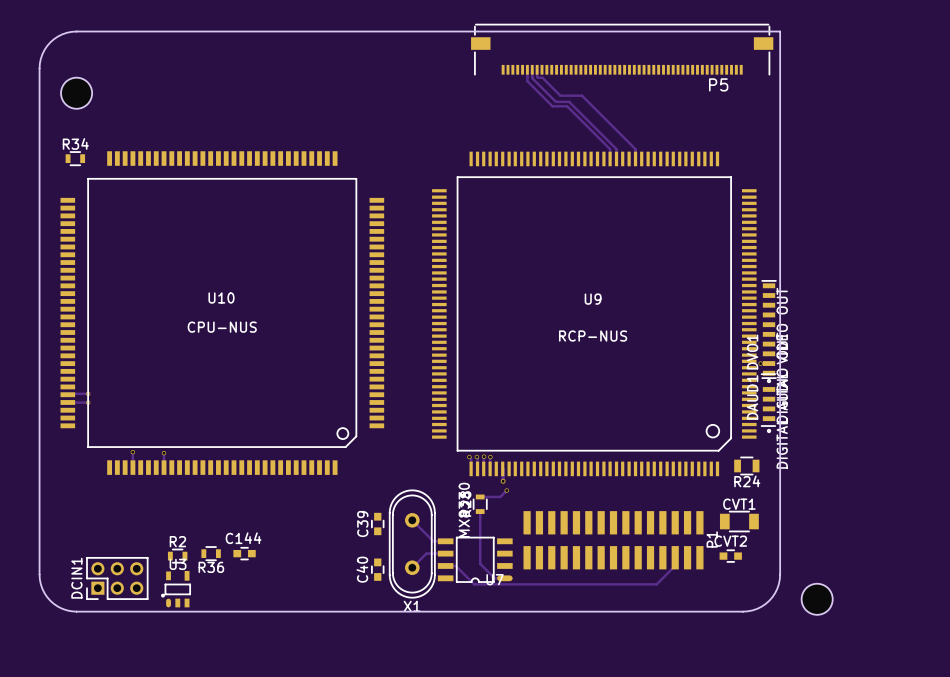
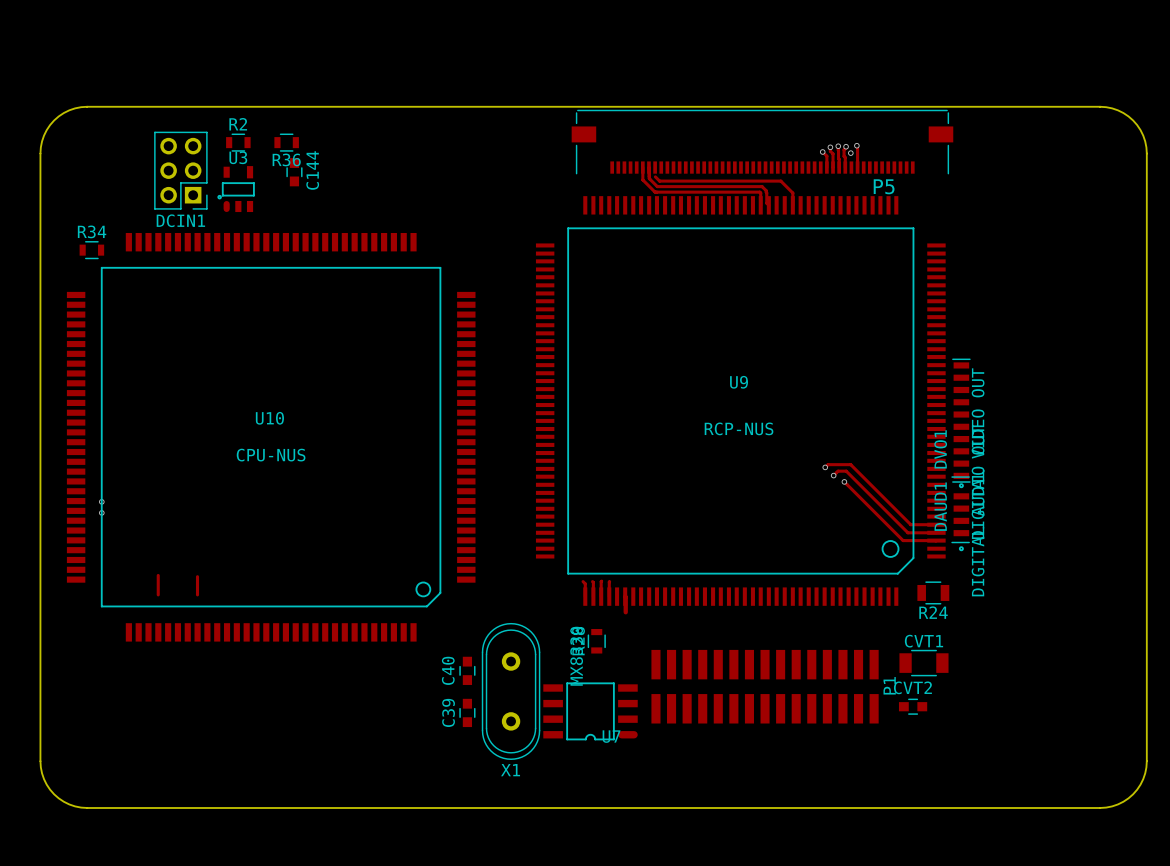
P5 position: (622, 49) -> (762, 142)
track: (527, 69) (527, 81) (552, 106) (567, 106) (609, 148) -> (642, 167) (642, 179) (655, 192) (759, 192)
track: (532, 69) (532, 78) (555, 101) (569, 101) (616, 149) (616, 158) -> (649, 176) (648, 167) (649, 178) (657, 186) (762, 186) (766, 190) (766, 203) (768, 205)
track: (537, 69) (537, 76) (542, 77) (560, 95) (581, 95) (626, 139) -> (655, 176) (659, 181) (780, 181)
part: (76, 93) -> none
track: none -> (856, 145) (857, 167)
via: none -> (856, 145)
track: none -> (830, 147) (833, 153) (833, 167)
via: none -> (830, 147)
track: none -> (838, 146) (839, 167)
via: none -> (838, 146)
track: none -> (846, 146) (844, 149) (845, 167)
via: none -> (846, 146)
track: none -> (822, 151) (826, 156) (826, 167)
via: none -> (822, 151)
board edge: (39, 117) (39, 68) (42, 54) (54, 39) (71, 31) (780, 31) (780, 574) (777, 588) (765, 603) (757, 608) (743, 611) (76, 611) (62, 608) (50, 600) (42, 588) (39, 574) -> (40, 153) (44, 135) (54, 120) (69, 110) (87, 106) (1100, 106) (1112, 108) (1123, 113) (1133, 120) (1140, 130) (1145, 141) (1146, 153) (1146, 761) (1143, 779) (1133, 794) (1117, 804) (1100, 807) (87, 807) (75, 806) (63, 801) (54, 794) (46, 784) (40, 767) (40, 730)
via: none -> (850, 153)
R34 position: (75, 158) -> (91, 250)
U10 position: (222, 313) -> (271, 437)
via: (760, 363) -> none
track: none -> (825, 467) (828, 464) (850, 464) (910, 524) (936, 524)
via: none -> (825, 467)
track: none -> (833, 475) (838, 471) (846, 471) (907, 532) (936, 532)
via: none -> (833, 475)
track: none -> (844, 481) (903, 540) (935, 541)
via: none -> (844, 481)
track: (88, 393) (67, 394) -> none
track: (67, 402) (88, 402) -> none
via: (132, 452) -> none
via: (163, 453) -> none
via: (484, 456) -> none
via: (469, 457) -> none
via: (476, 457) -> none
via: (490, 457) -> none
via: (503, 481) -> none
track: (506, 490) (500, 496) (480, 496) -> none
via: (506, 490) -> none
track: (480, 511) (480, 563) (494, 578) (504, 578) -> none
track: (412, 520) (433, 541) (445, 541) -> none
C39 position: (377, 524) -> (467, 712)
R36 position: (211, 553) -> (286, 142)
C144 rotation: 0° (244, 553) -> 90° clockwise (294, 172)
C144 position: (244, 553) -> (294, 172)
track: (445, 553) (426, 553) (412, 567) -> none
R2 position: (177, 556) -> (238, 142)
track: (675, 557) (675, 565) (656, 584) (474, 584) (455, 565) (445, 565) -> none
C40 position: (377, 569) -> (467, 670)
DCIN1 rotation: 0° (117, 578) -> 90° counterclockwise (180, 170)
DCIN1 position: (117, 578) -> (180, 170)
U3 position: (176, 589) -> (236, 189)
part: (817, 599) -> none

